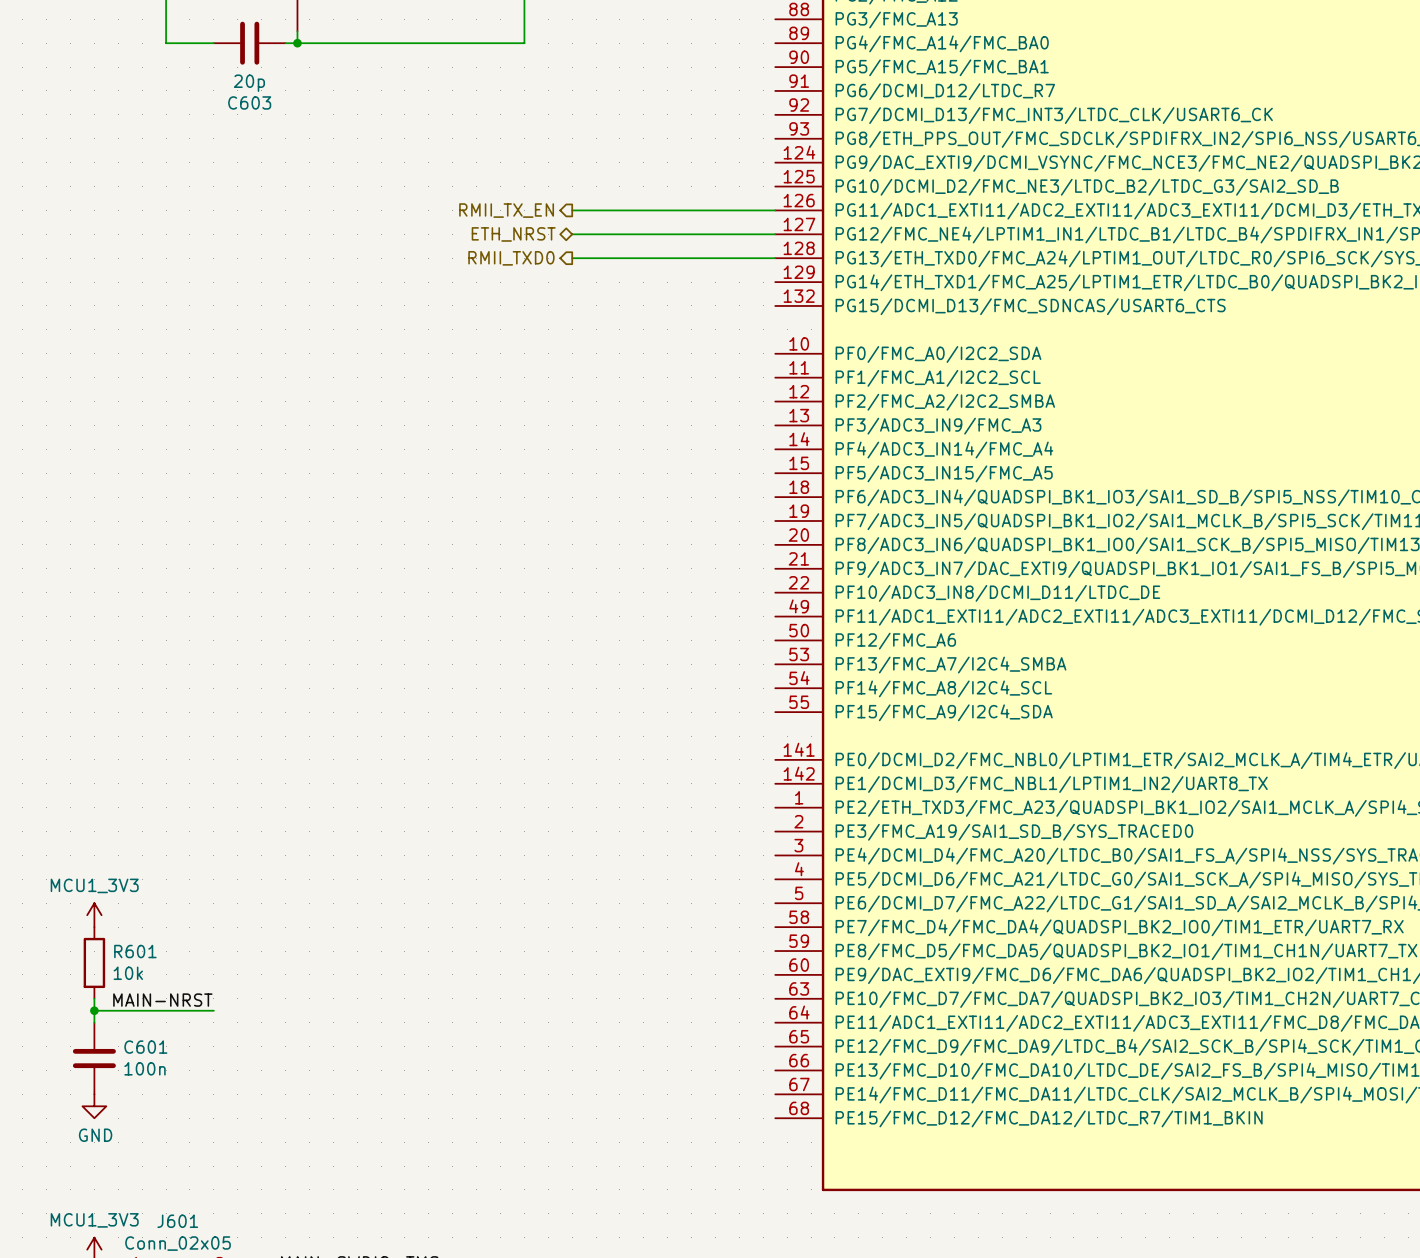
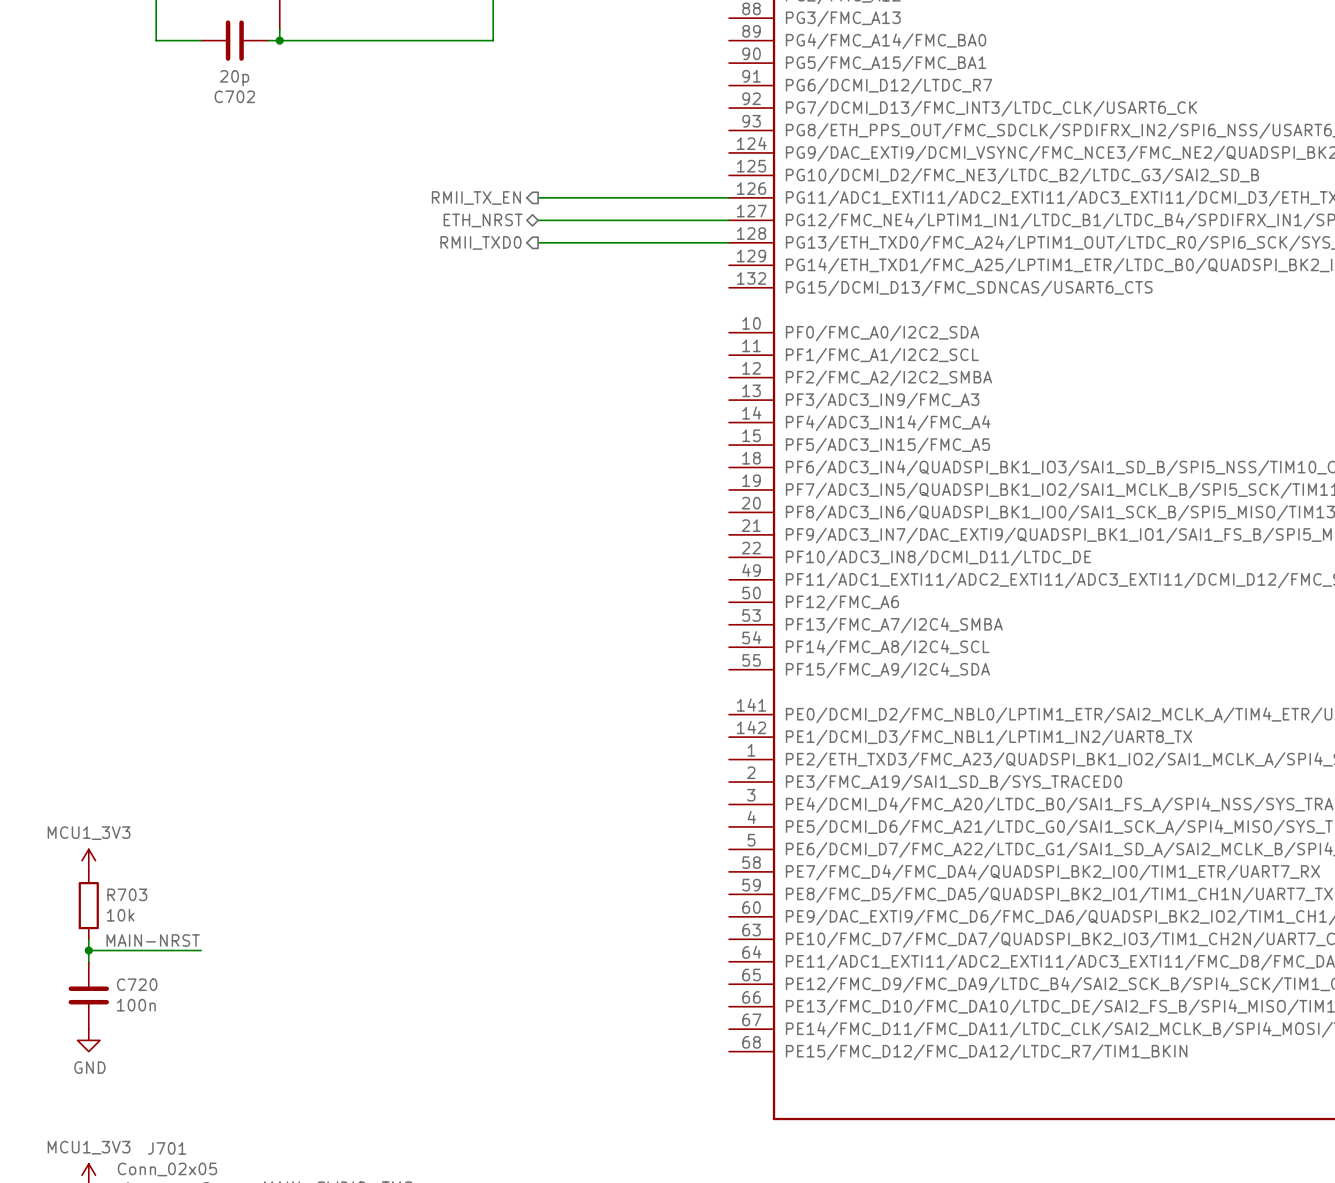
C603 name: C603 (249, 102) -> C702 (234, 96)
R601 name: R601 (135, 951) -> R703 (127, 894)
C601 name: C601 (145, 1047) -> C720 (137, 984)
J601 name: J601 (177, 1221) -> J701 (167, 1148)

